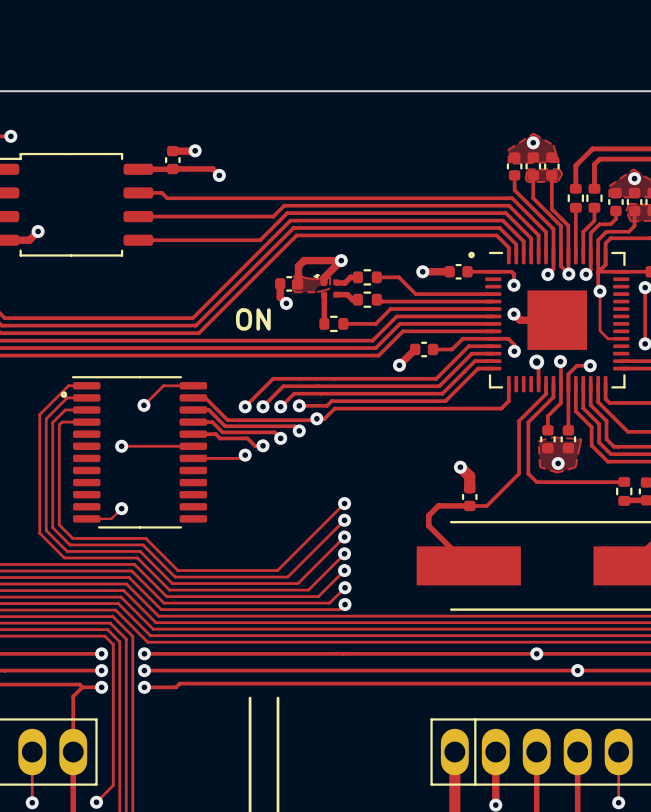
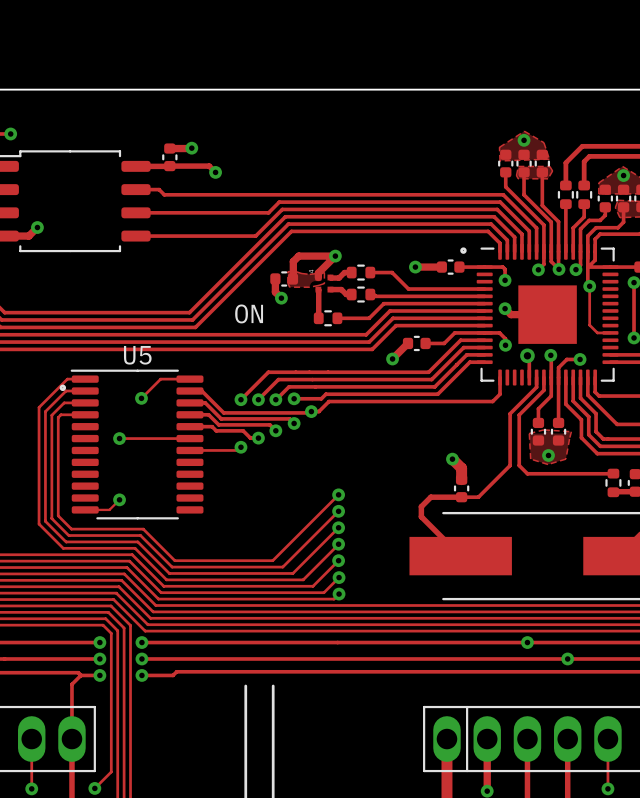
U5 name: none -> U5 (137, 355)

